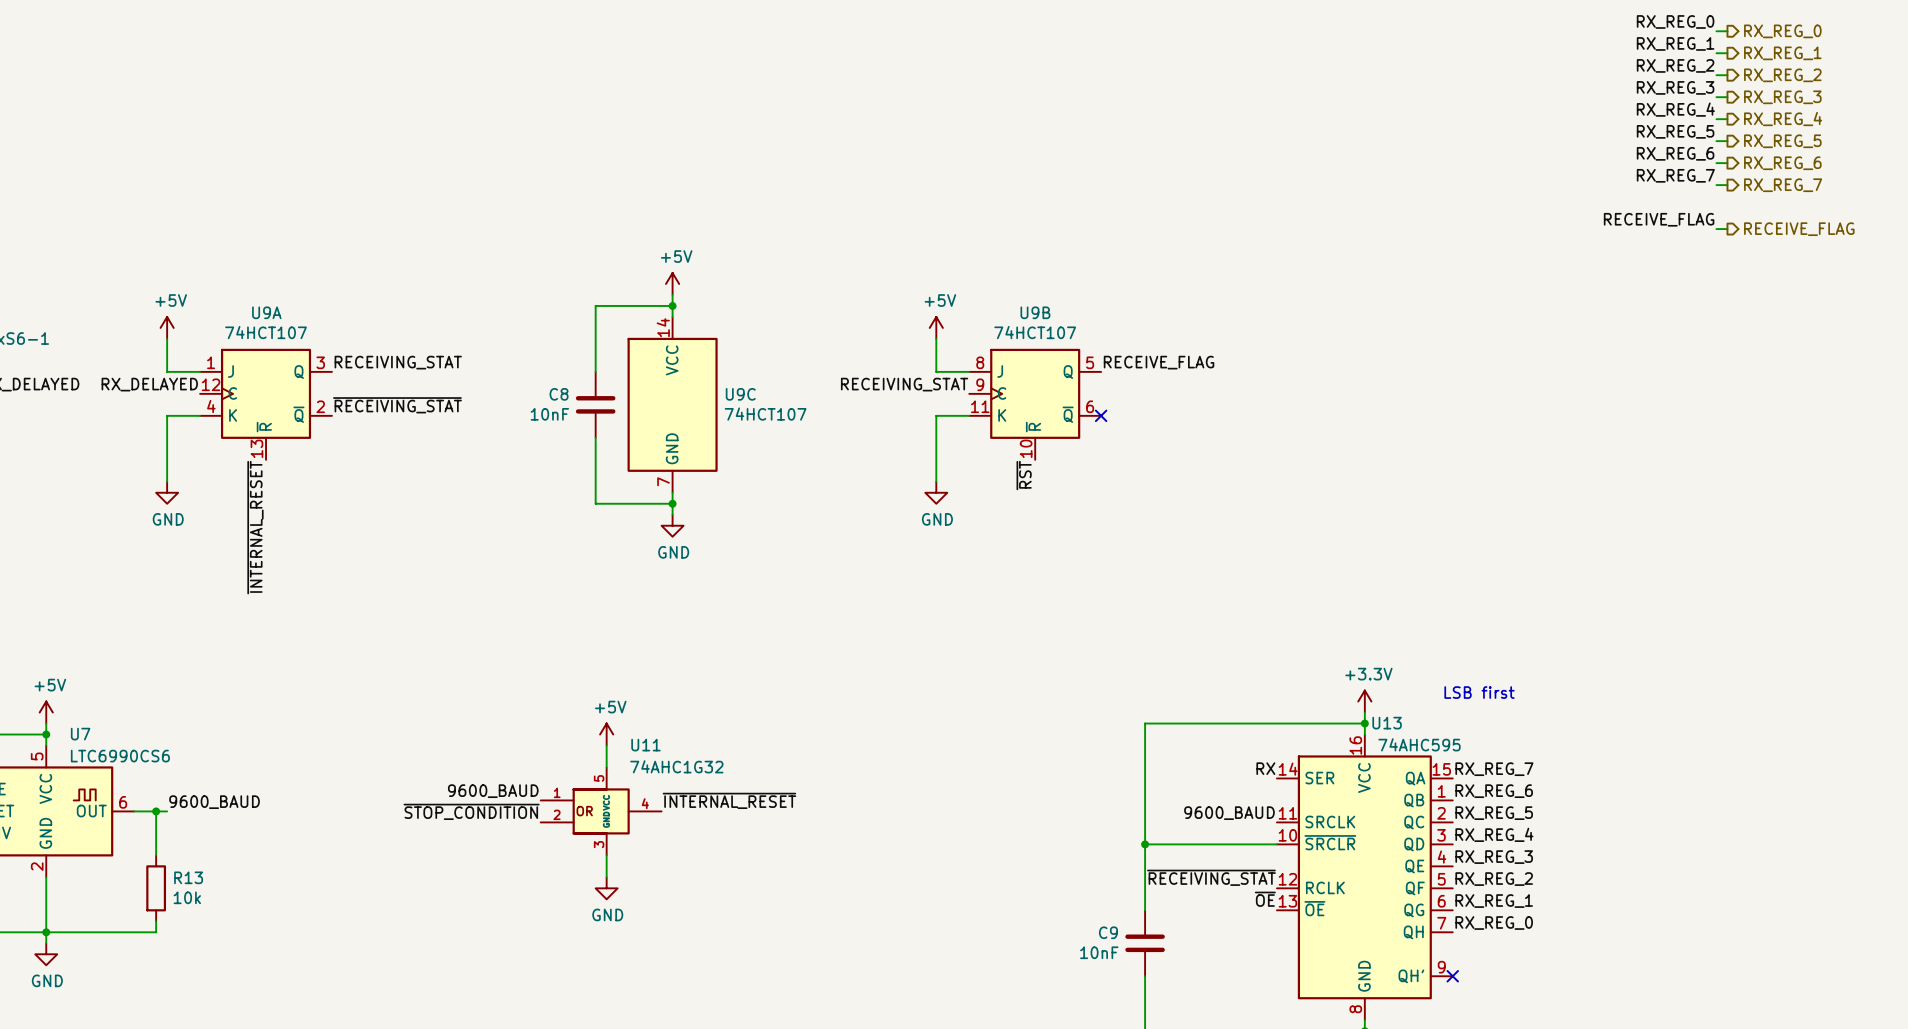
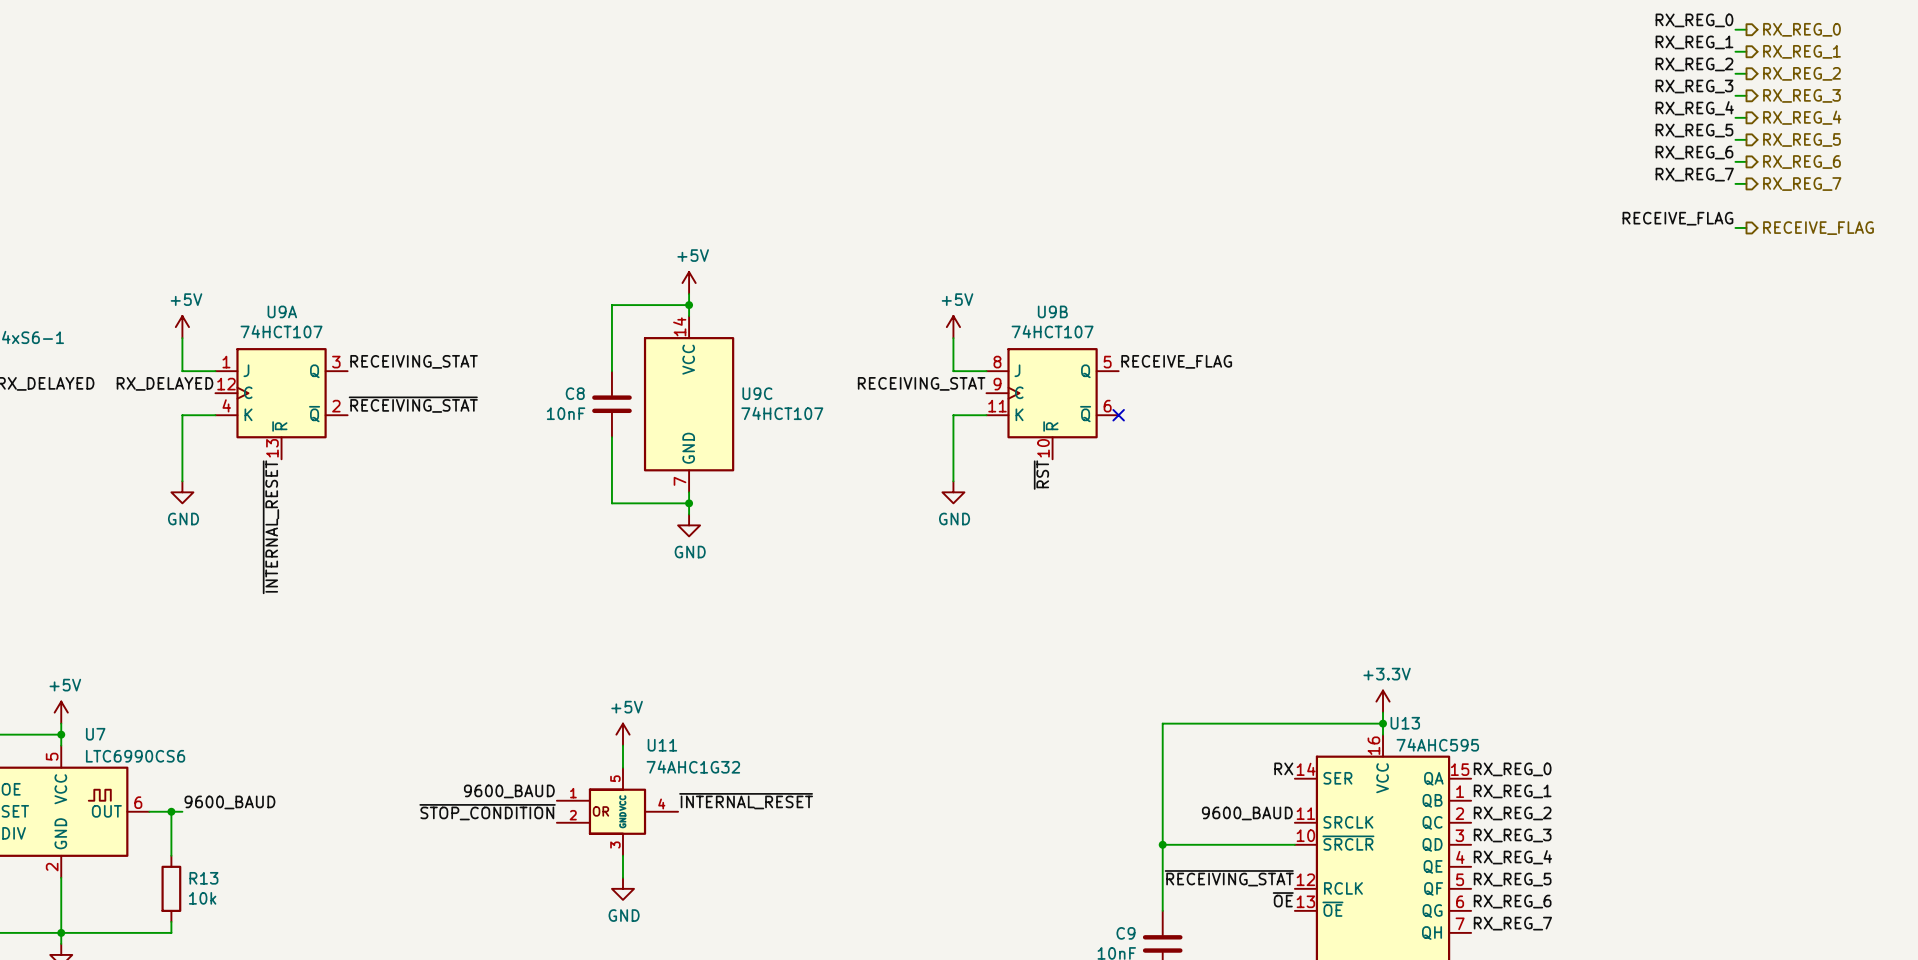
text: LSB first (1479, 692) -> none
label: RX_REG_7 (1494, 769) -> RX_REG_0 (1512, 769)
label: RX_REG_6 (1494, 791) -> RX_REG_1 (1512, 791)
label: RX_REG_5 (1494, 813) -> RX_REG_2 (1512, 813)
label: RX_REG_4 (1494, 834) -> RX_REG_3 (1512, 835)
label: RX_REG_3 (1494, 857) -> RX_REG_4 (1512, 857)
label: RX_REG_2 (1494, 879) -> RX_REG_5 (1512, 879)
label: RX_REG_1 (1494, 901) -> RX_REG_6 (1512, 901)
label: RX_REG_0 (1494, 923) -> RX_REG_7 (1512, 923)

